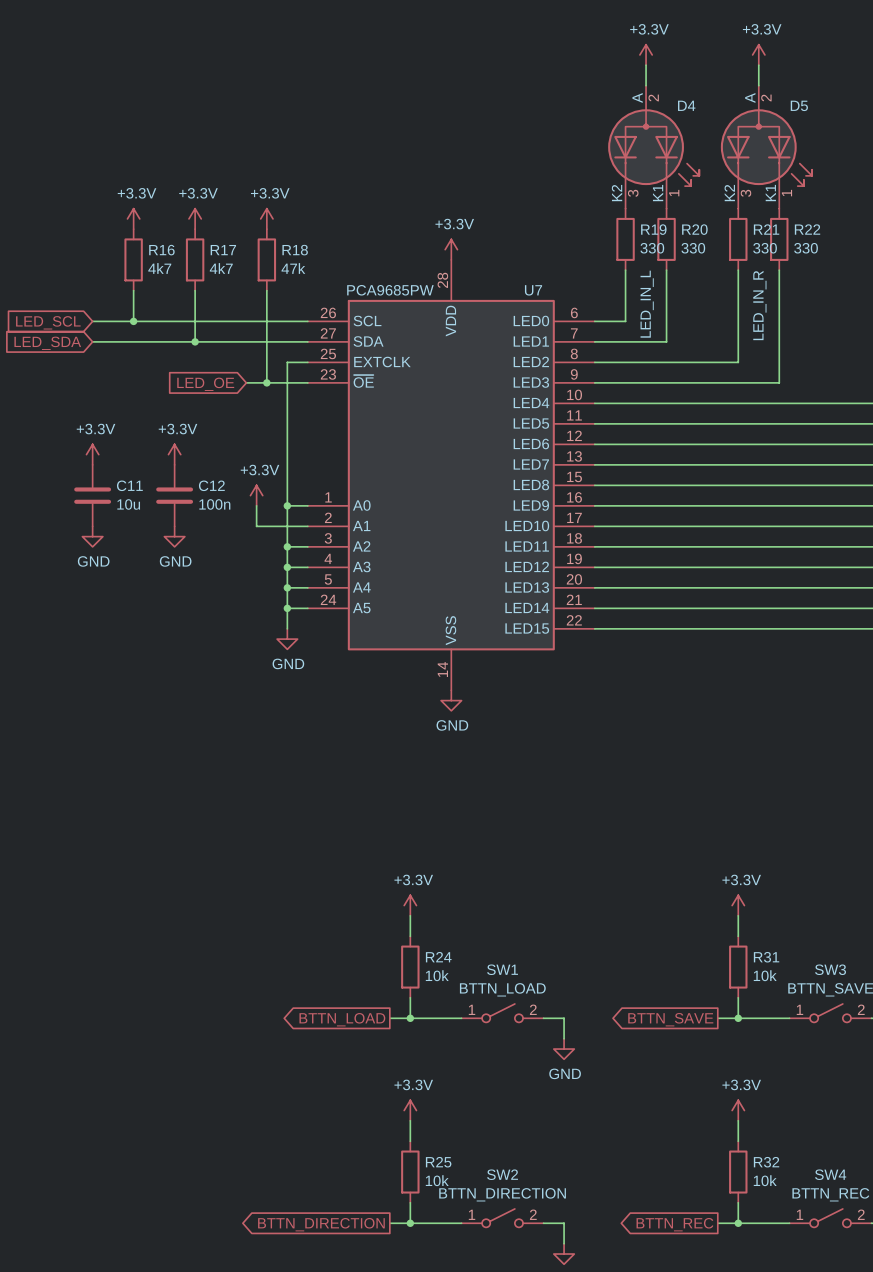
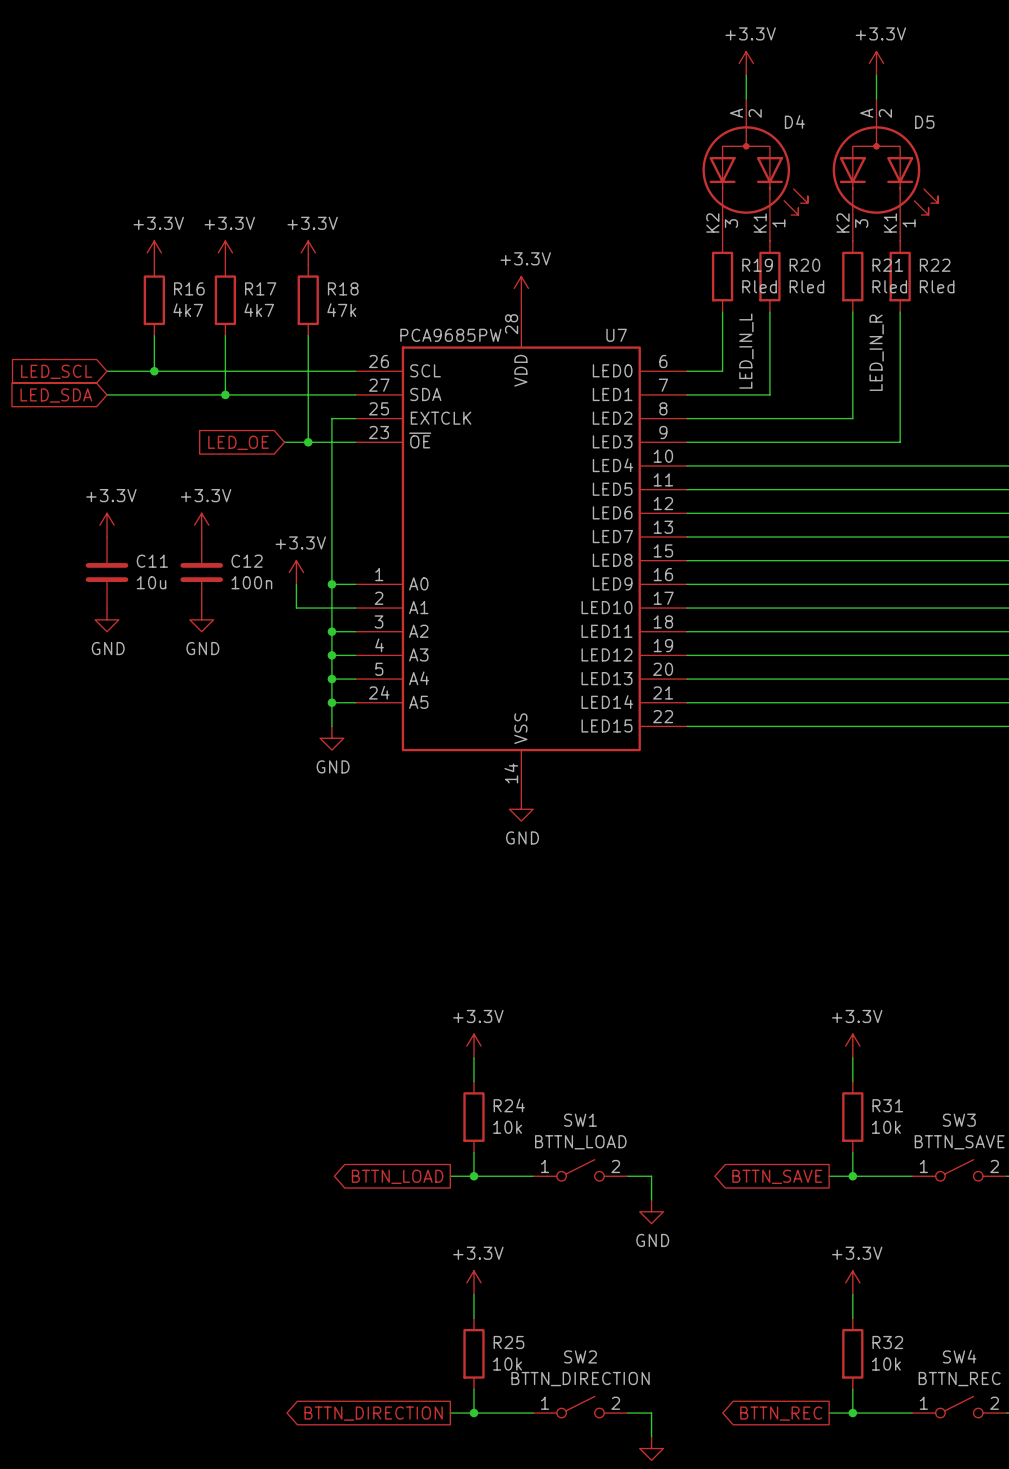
R19 value: 330 (652, 248) -> Rled (759, 286)
R20 value: 330 (693, 248) -> Rled (806, 286)
R21 value: 330 (765, 248) -> Rled (889, 286)
R22 value: 330 (806, 248) -> Rled (937, 286)

